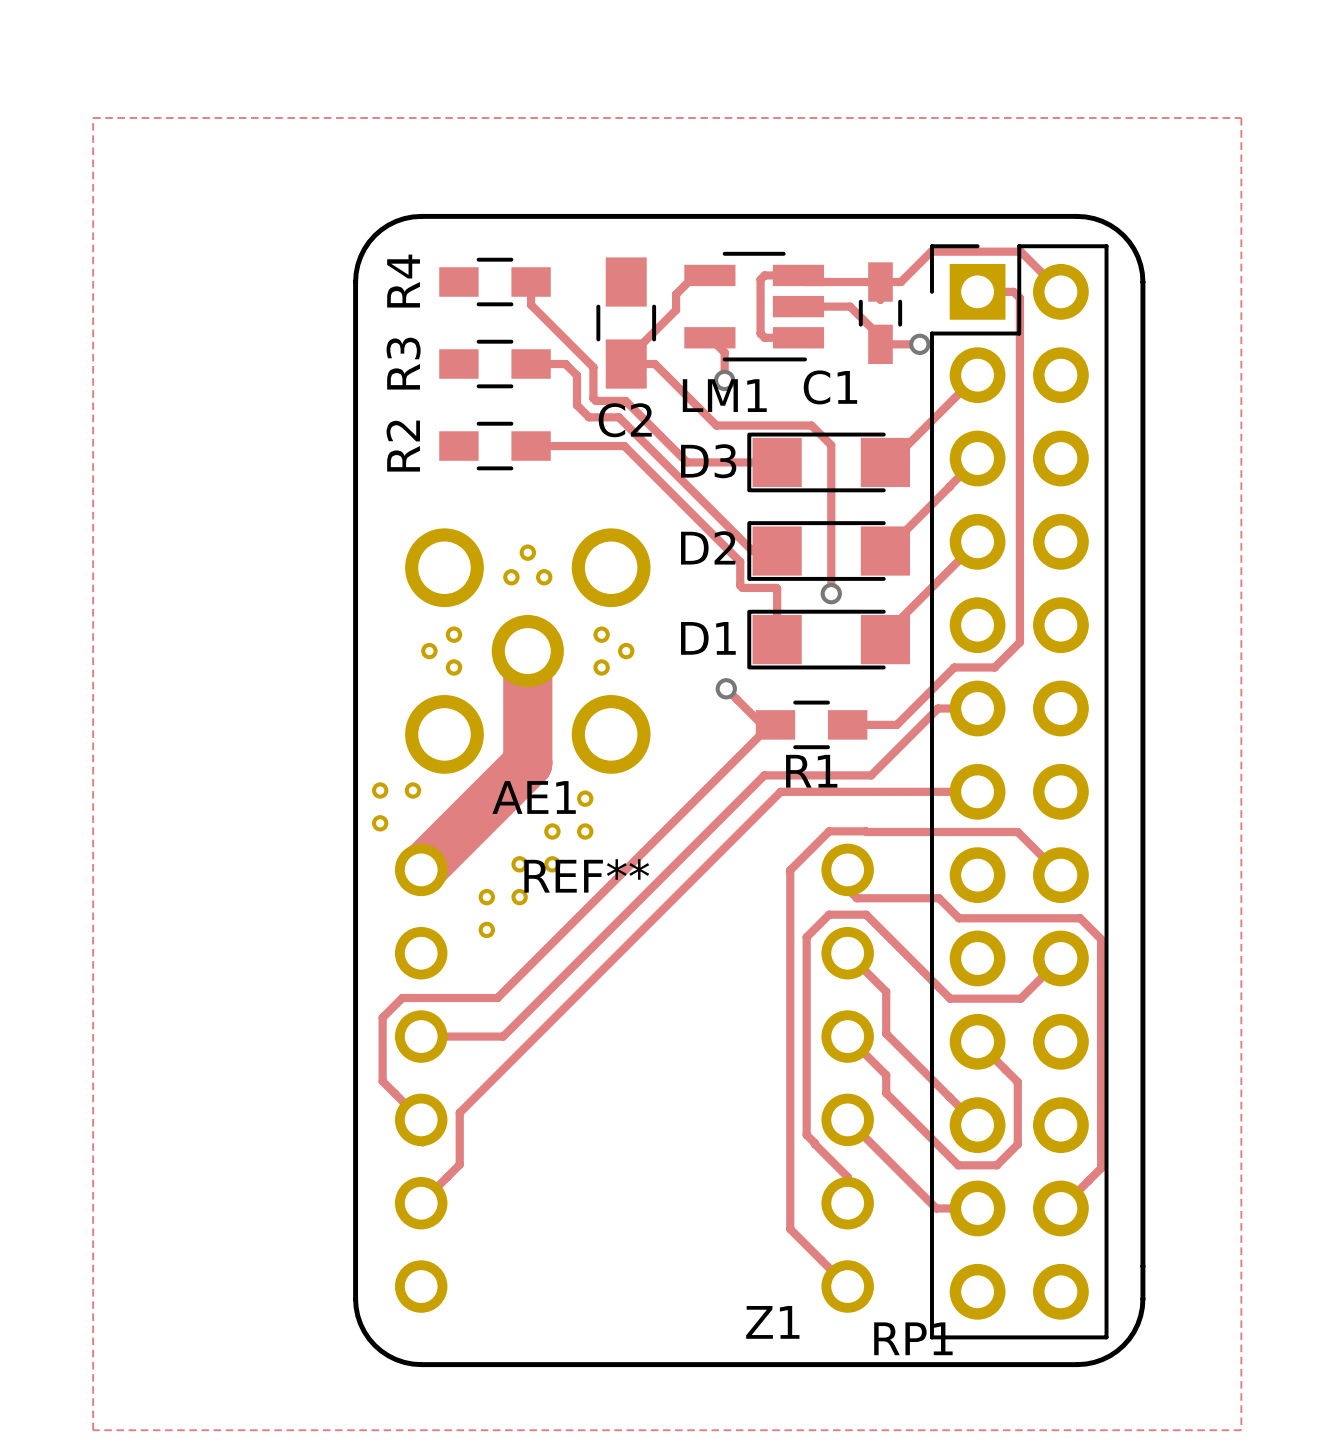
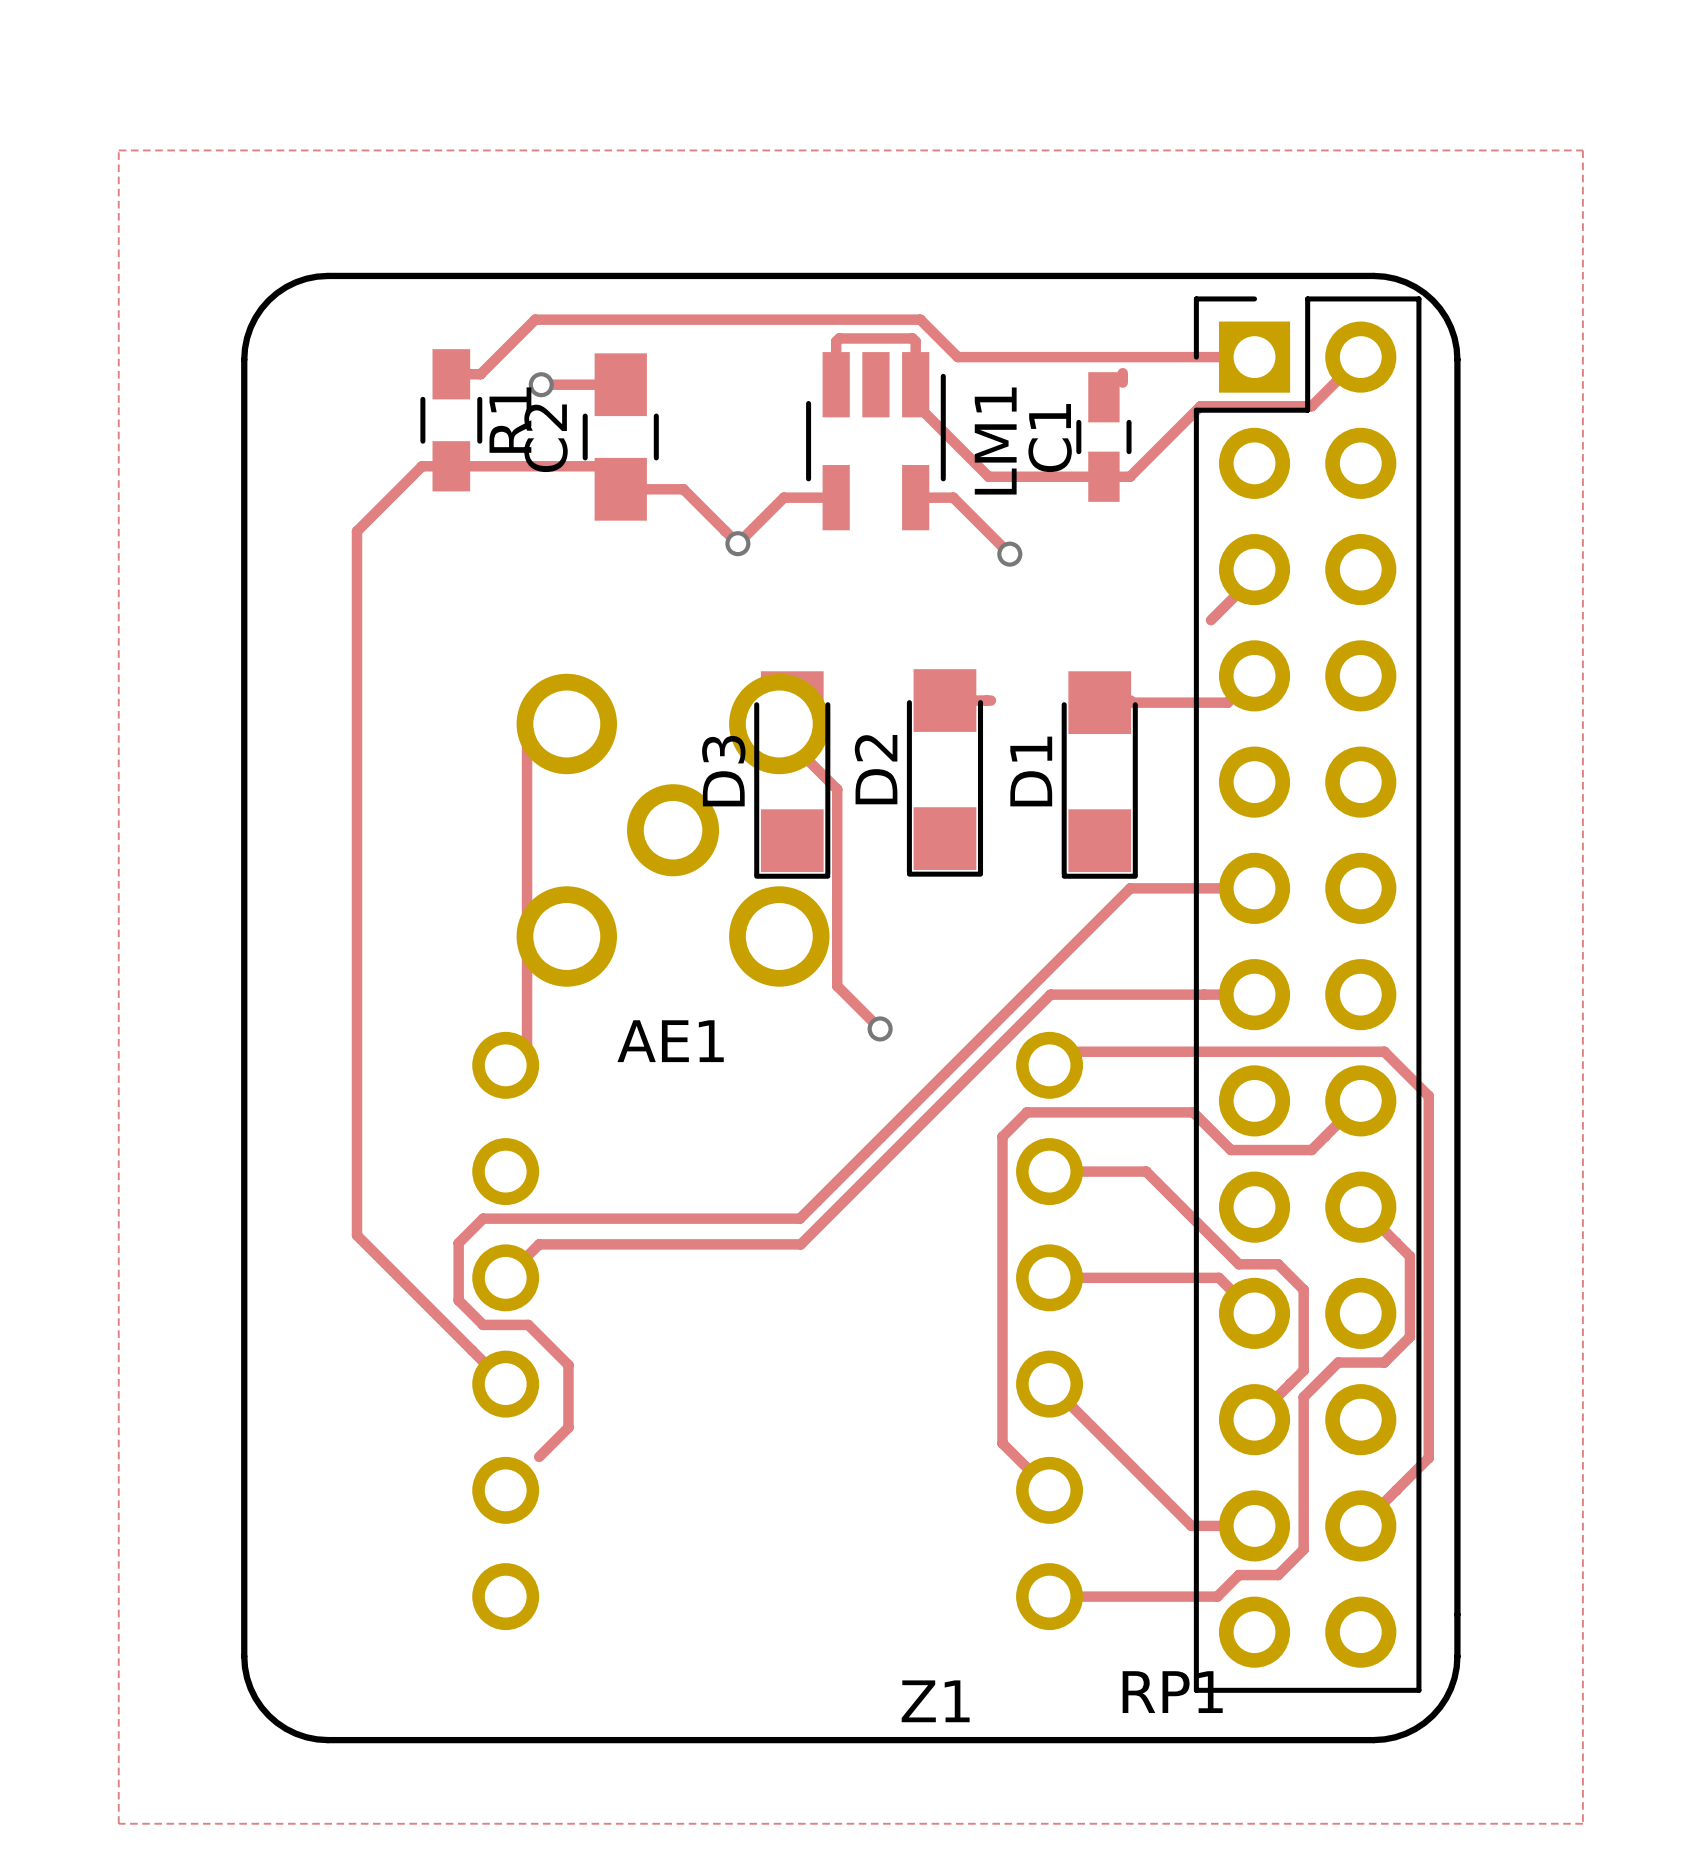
board edge: (421, 216) (396, 221) (374, 235) (360, 256) (355, 282) (355, 1299) (360, 1324) (374, 1345) (396, 1359) (421, 1364) -> (537, 275) (327, 275) (306, 278) (286, 287) (261, 308) (250, 327) (244, 359) (244, 1656) (247, 1678) (255, 1698) (268, 1715) (286, 1728) (306, 1737) (327, 1740) (537, 1740)
track: (709, 275) (694, 275) (676, 294) (676, 310) (626, 359) (626, 364) (654, 364) (716, 425) (811, 425) (831, 445) (831, 593) -> none
track: none -> (1254, 357) (957, 357) (920, 319) (535, 319) (480, 374) (451, 374)
track: none -> (1360, 357) (1311, 406) (1200, 406) (1130, 476) (988, 476) (915, 403) (915, 341) (912, 338) (839, 338) (836, 341) (836, 384)
R4: (495, 282) -> none
track: (531, 282) (531, 304) (593, 367) (593, 398) (595, 400) (625, 400) (687, 462) (777, 462) -> none
track: (977, 291) (1013, 291) (1019, 298) (1019, 642) (994, 667) (954, 667) (896, 724) (847, 724) -> none
track: (1060, 291) (1020, 251) (931, 251) (900, 282) (805, 282) (798, 275) (764, 275) (760, 279) (760, 333) (764, 337) (798, 337) -> none
track: none -> (541, 384) (620, 384)
via: none -> (541, 384)
LM1 rotation: 0° (754, 306) -> 90° counterclockwise (875, 441)
track: (798, 306) (850, 306) (880, 336) (880, 344) (919, 344) -> none
C1 position: (880, 313) -> (1103, 437)
C2 position: (626, 323) -> (620, 437)
track: (709, 337) (724, 352) (724, 380) -> none
via: (919, 344) -> none
R3: (495, 364) -> none
track: (531, 364) (565, 364) (577, 375) (577, 405) (589, 417) (618, 417) (752, 551) (777, 551) -> none
track: (977, 375) (890, 462) (885, 462) -> none
via: (724, 380) -> none
C1 name rotation: 0° (830, 387) -> 90° counterclockwise (1050, 438)
track: none -> (836, 497) (783, 497) (737, 543) (683, 489) (620, 489) (597, 466) (422, 466) (356, 531) (356, 1235) (505, 1384)
track: none -> (915, 497) (953, 497) (1009, 554)
C2 name rotation: 0° (625, 420) -> 90° counterclockwise (546, 438)
C2 name position: C2 (625, 420) -> C2 (546, 438)
via: none -> (737, 543)
via: none -> (1009, 554)
R2: (495, 446) -> none
track: (531, 446) (624, 446) (740, 561) (740, 585) (742, 587) (777, 588) (777, 639) -> none
D3 name position: D3 (708, 461) -> D3 (723, 771)
D3 rotation: 0° (828, 462) -> 90° counterclockwise (792, 775)
D3 position: (828, 462) -> (792, 775)
track: (949, 486) (885, 551) -> none
track: (977, 541) (885, 634) (885, 639) -> none
D2 name position: D2 (708, 547) -> D2 (876, 769)
track: none -> (792, 702) (792, 744) (837, 789) (837, 986) (880, 1028)
D2 rotation: 0° (828, 551) -> 90° counterclockwise (944, 772)
D2 position: (828, 551) -> (944, 772)
track: none -> (1099, 702) (1227, 702)
part: (527, 552) -> none
part: (511, 577) -> none
part: (544, 577) -> none
track: none -> (527, 739) (527, 1044) (505, 1065)
via: (831, 593) -> none
part: (454, 634) -> none
part: (601, 634) -> none
D1 name position: D1 (708, 638) -> D1 (1031, 771)
D1 rotation: 0° (828, 639) -> 90° counterclockwise (1099, 775)
part: (429, 651) -> none
track: (527, 651) (527, 763) (421, 869) -> none
part: (626, 651) -> none
part: (454, 667) -> none
part: (601, 667) -> none
track: (726, 688) (762, 724) (775, 724) -> none
via: (726, 688) -> none
track: none -> (1254, 888) (1130, 888) (799, 1218) (483, 1218) (458, 1243) (458, 1300) (483, 1324) (528, 1324) (568, 1365) (568, 1427) (552, 1443)
track: (977, 708) (938, 708) (871, 775) (764, 775) (503, 1036) (421, 1036) -> none
track: (770, 724) (497, 998) (402, 998) (382, 1017) (382, 1081) (421, 1119) -> none
R1 rotation: 0° (811, 724) -> 90° clockwise (451, 420)
R1 position: (811, 724) -> (451, 420)
R1 name position: R1 (811, 771) -> R1 (510, 420)
track: none -> (1254, 994) (1050, 994) (800, 1244) (539, 1244) (505, 1277)
part: (380, 790) -> none
part: (412, 790) -> none
track: (977, 791) (780, 791) (459, 1112) (459, 1164) (421, 1203) -> none
RP1 position: (1019, 791) -> (1307, 994)
AE1 name position: AE1 (534, 797) -> AE1 (670, 1041)
REF**: (585, 798) -> none
via: none -> (880, 1028)
part: (380, 823) -> none
part: (552, 831) -> none
part: (585, 831) -> none
track: none -> (1049, 1065) (1063, 1051) (1384, 1051) (1428, 1096) (1428, 1457) (1360, 1525)
track: none -> (1360, 1100) (1311, 1150) (1230, 1150) (1193, 1112) (1026, 1112) (1002, 1136) (1002, 1443) (1049, 1490)
part: (519, 864) -> none
part: (552, 864) -> none
track: (847, 869) (847, 888) (857, 898) (939, 898) (959, 918) (1080, 918) (1101, 939) (1101, 1168) (1060, 1208) -> none
track: (1060, 875) (1017, 832) (829, 831) (790, 870) (790, 1229) (847, 1286) -> none
part: (486, 897) -> none
part: (519, 897) -> none
track: none -> (1049, 1171) (1146, 1171) (1238, 1264) (1278, 1264) (1303, 1289) (1303, 1370) (1254, 1419)
part: (486, 929) -> none
track: none -> (1360, 1207) (1409, 1256) (1409, 1337) (1384, 1362) (1338, 1362) (1303, 1397) (1303, 1549) (1278, 1575) (1238, 1575) (1217, 1596) (1049, 1596)
track: (847, 953) (886, 991) (886, 1033) (977, 1125) -> none
track: (1060, 958) (1020, 998) (950, 998) (866, 914) (829, 914) (806, 937) (806, 1134) (847, 1176) (847, 1203) -> none
track: none -> (1049, 1277) (1218, 1277) (1254, 1313)
track: (847, 1036) (886, 1075) (886, 1093) (958, 1165) (996, 1165) (1017, 1144) (1017, 1081) (977, 1041) -> none
Z1 position: (634, 1078) -> (777, 1330)
track: none -> (1049, 1384) (1191, 1525) (1254, 1525)
track: (847, 1119) (936, 1208) (977, 1208) -> none
Z1 name position: Z1 (772, 1322) -> Z1 (935, 1701)

